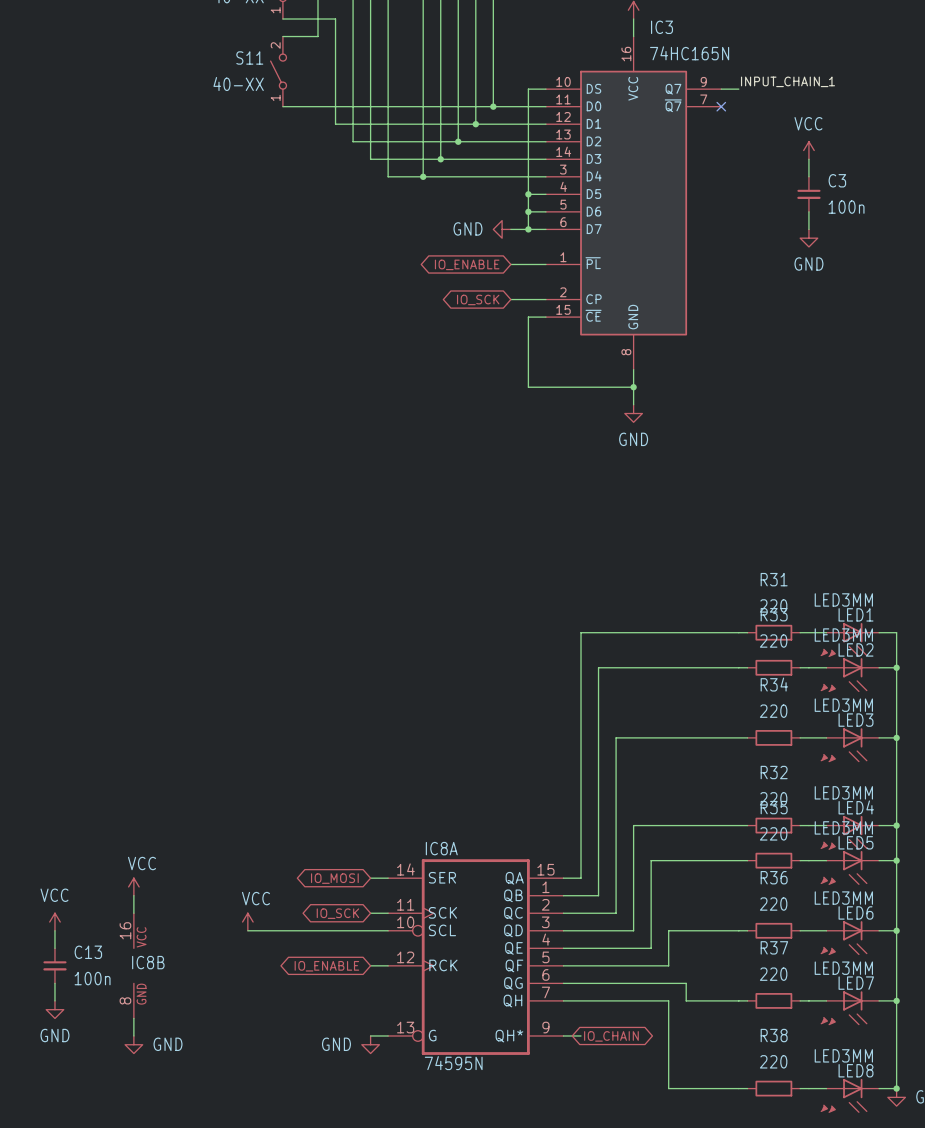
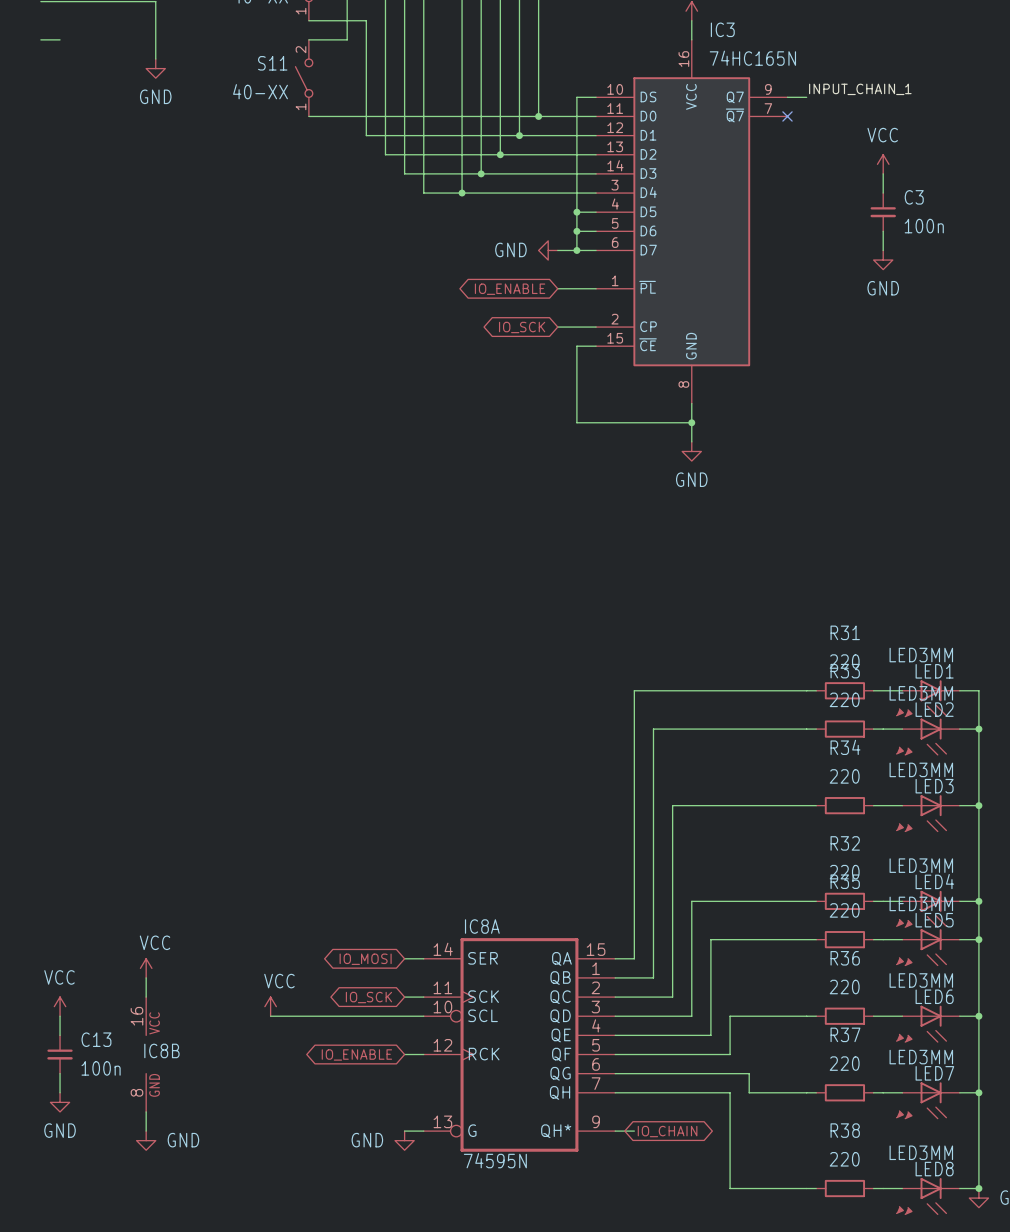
wire: none -> (40, 1) (155, 1) (155, 59)
wire: none -> (40, 39) (60, 39)
power symbol: none -> GND (155, 68)

